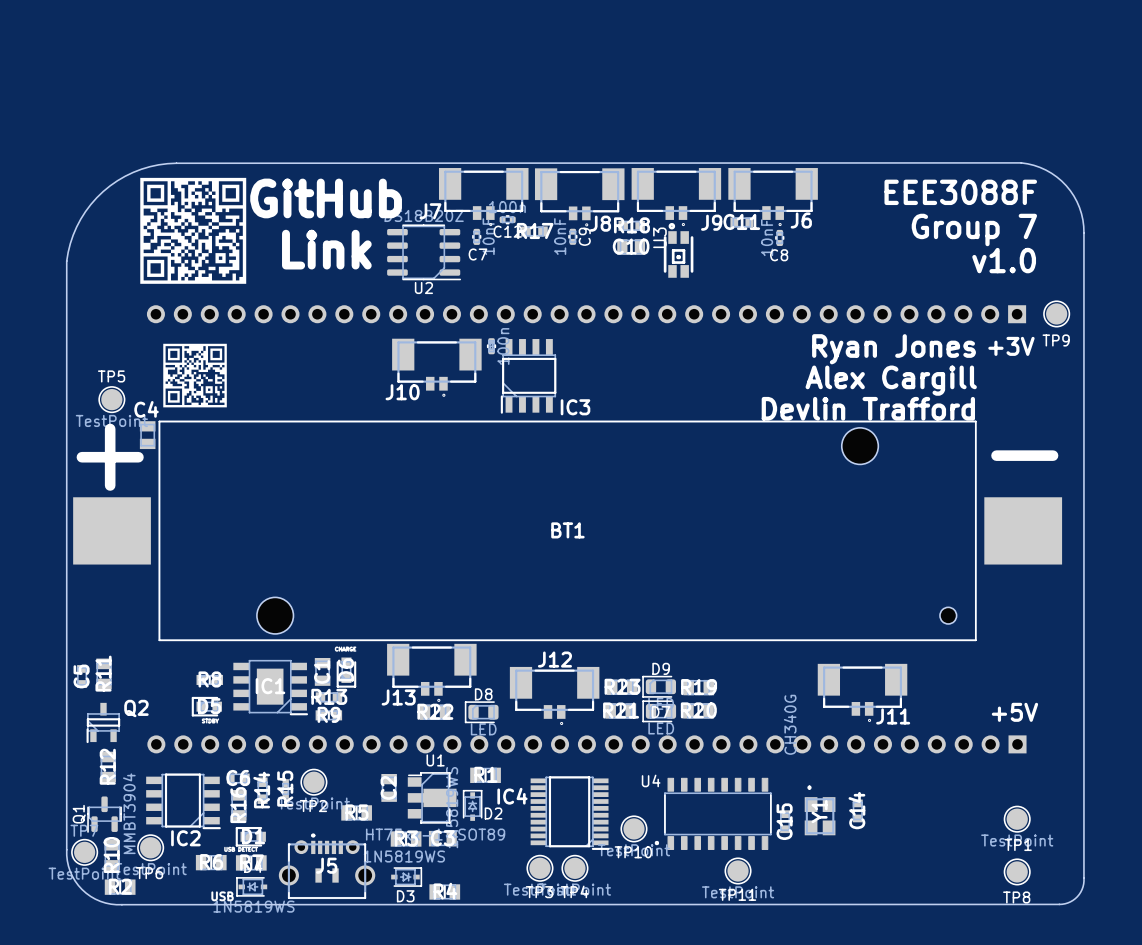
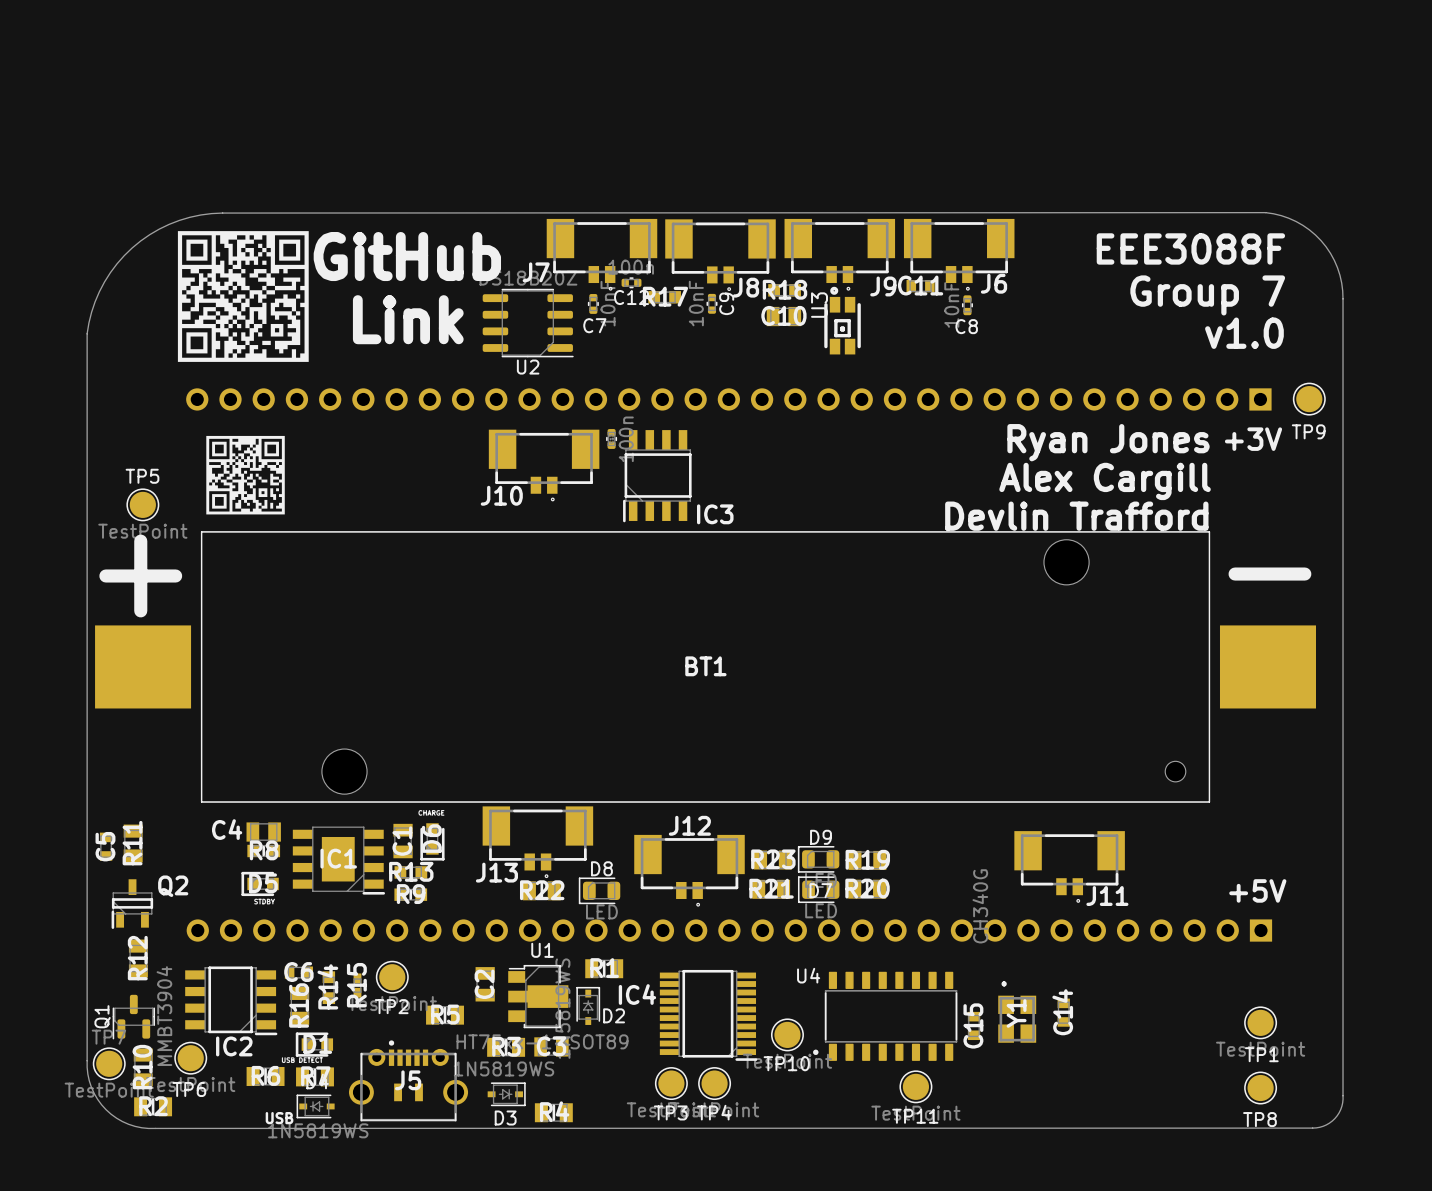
C4 name position: C4 (146, 409) -> C4 (227, 829)
C4 rotation: 0° (147, 435) -> 90° clockwise (263, 832)
C4 position: (147, 435) -> (263, 832)

